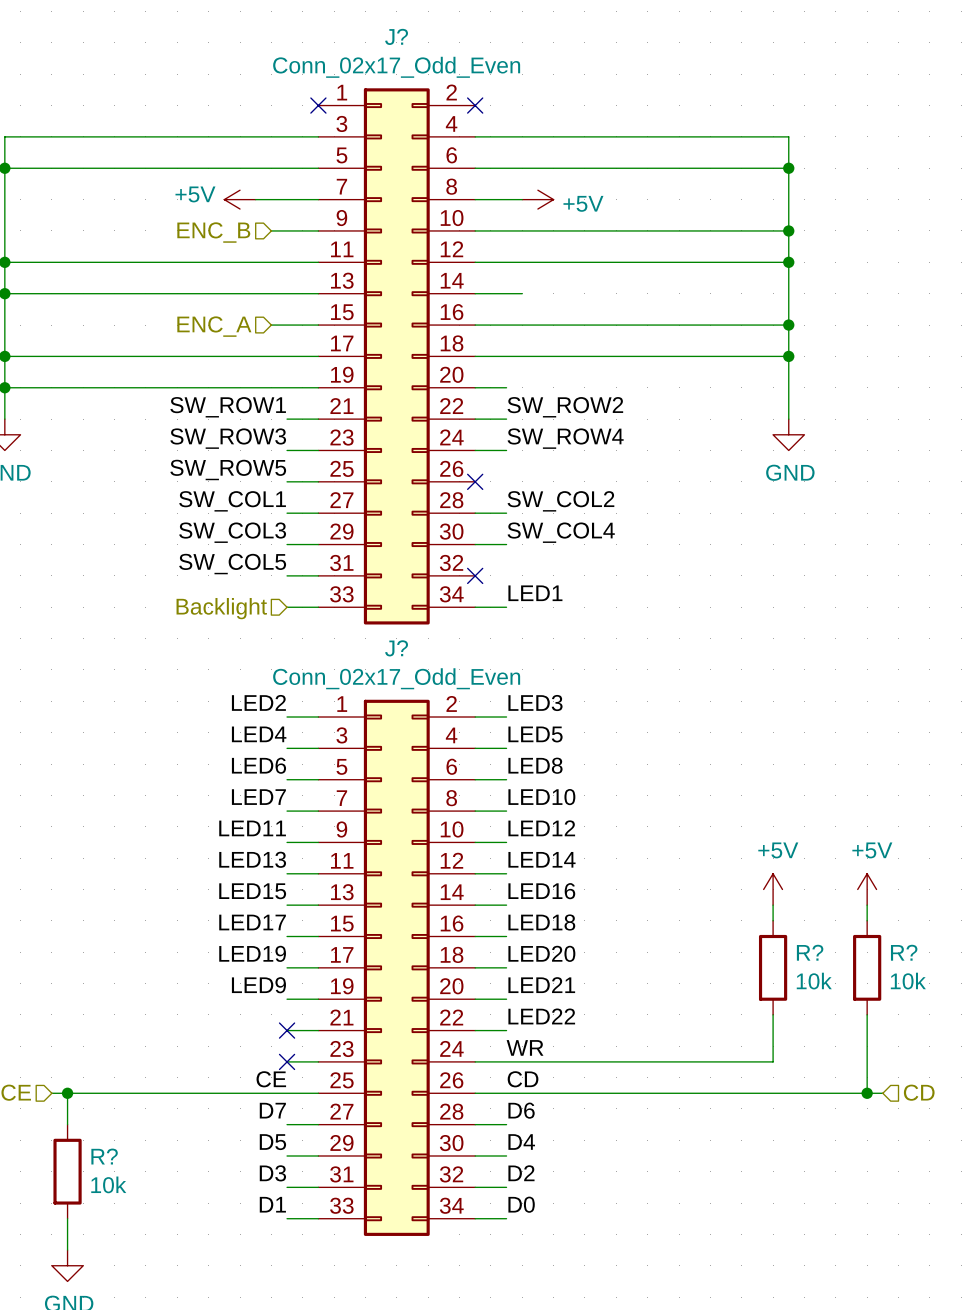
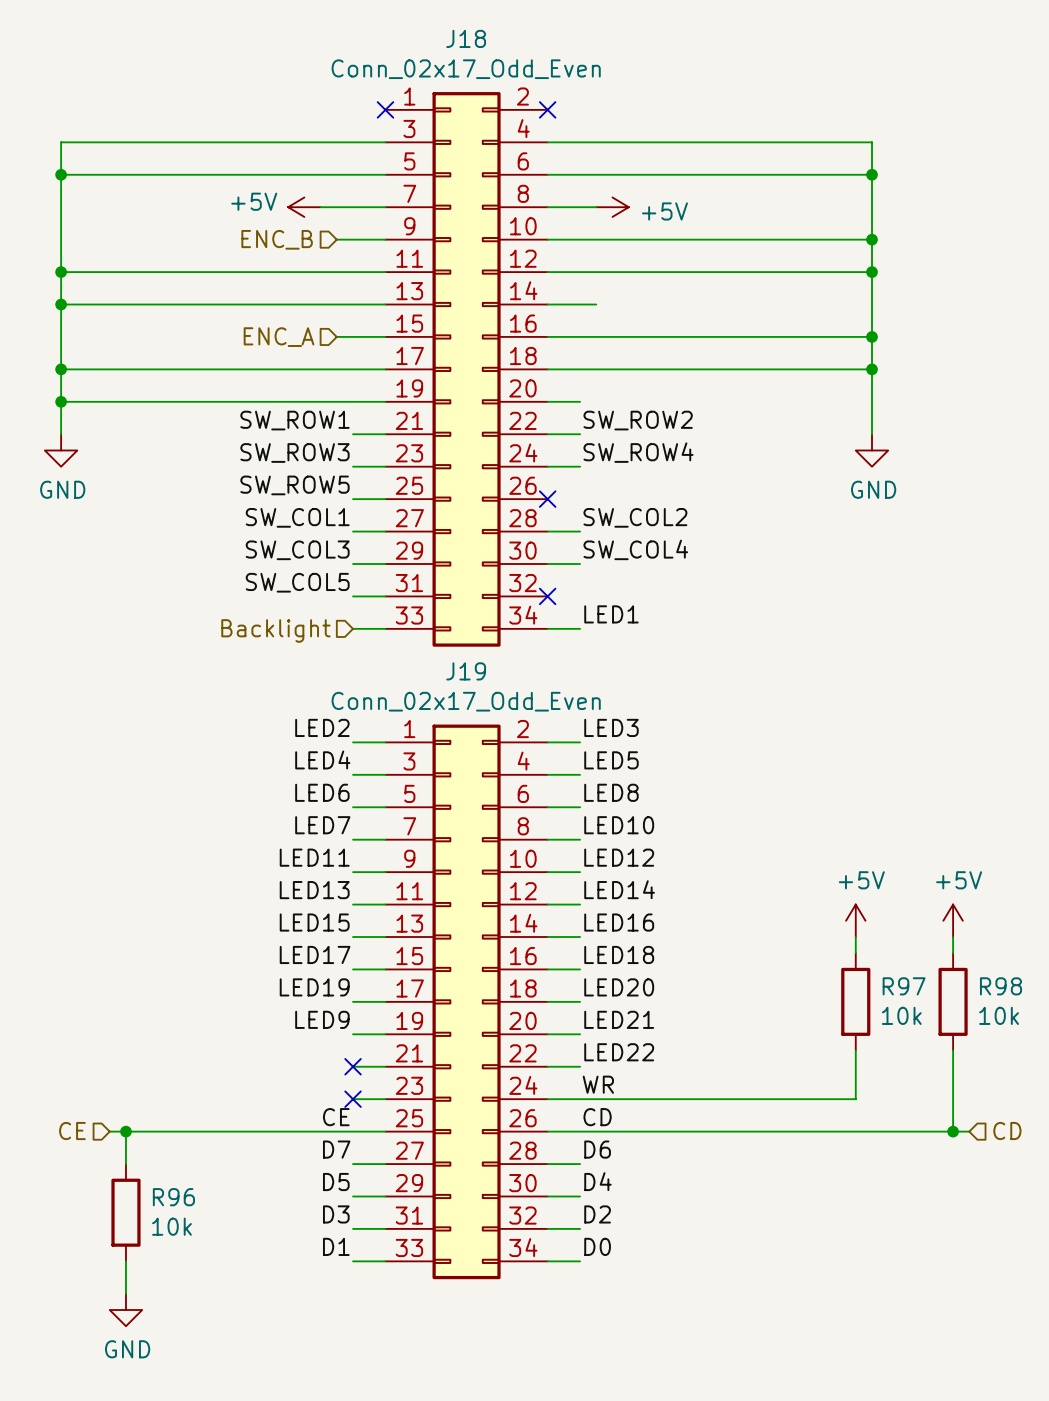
J? name: J? (396, 36) -> J18 (466, 38)
J? name: J? (396, 648) -> J19 (466, 671)
R? name: R? (810, 952) -> R97 (904, 986)
R? name: R? (904, 952) -> R98 (1001, 986)
R? name: R? (104, 1156) -> R96 (173, 1197)

